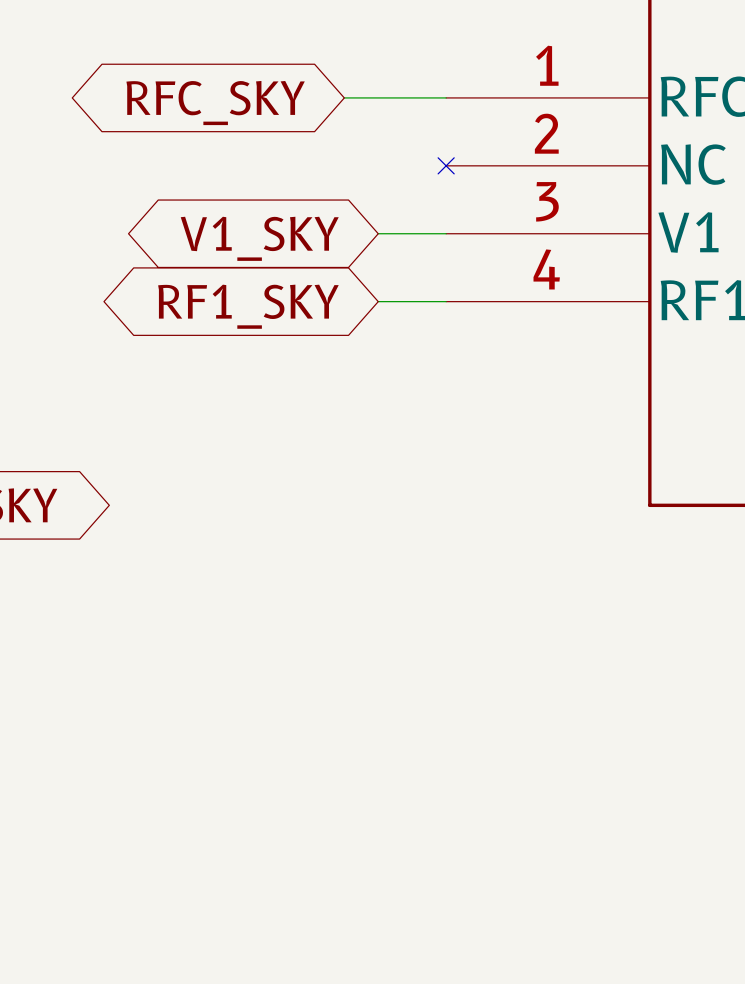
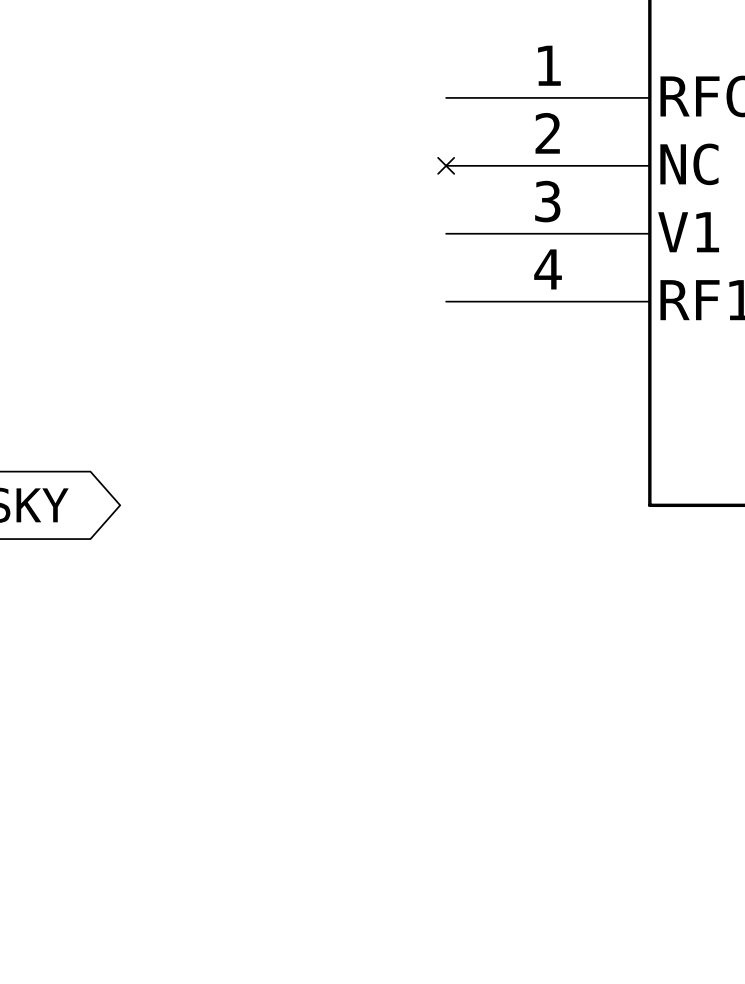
wire: (344, 97) (446, 97) -> none
global label: RFC_SKY (215, 103) -> none
wire: (378, 233) (446, 233) -> none
global label: V1_SKY (259, 238) -> none
wire: (378, 301) (446, 301) -> none
global label: RF1_SKY (248, 306) -> none

